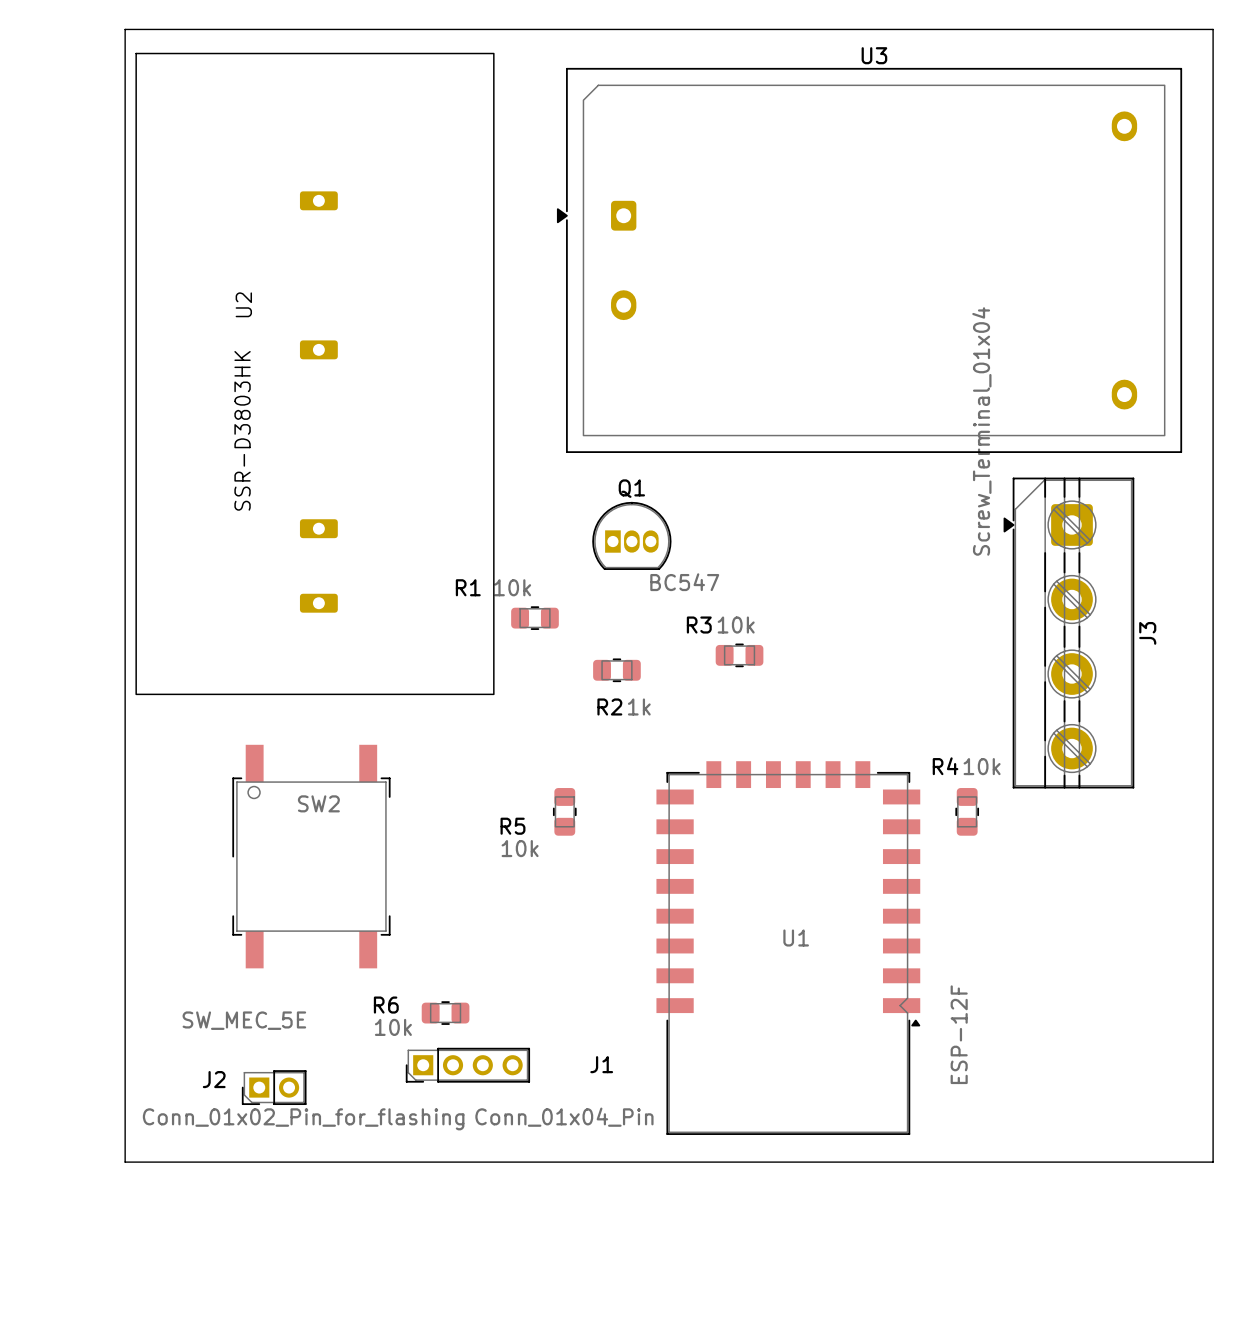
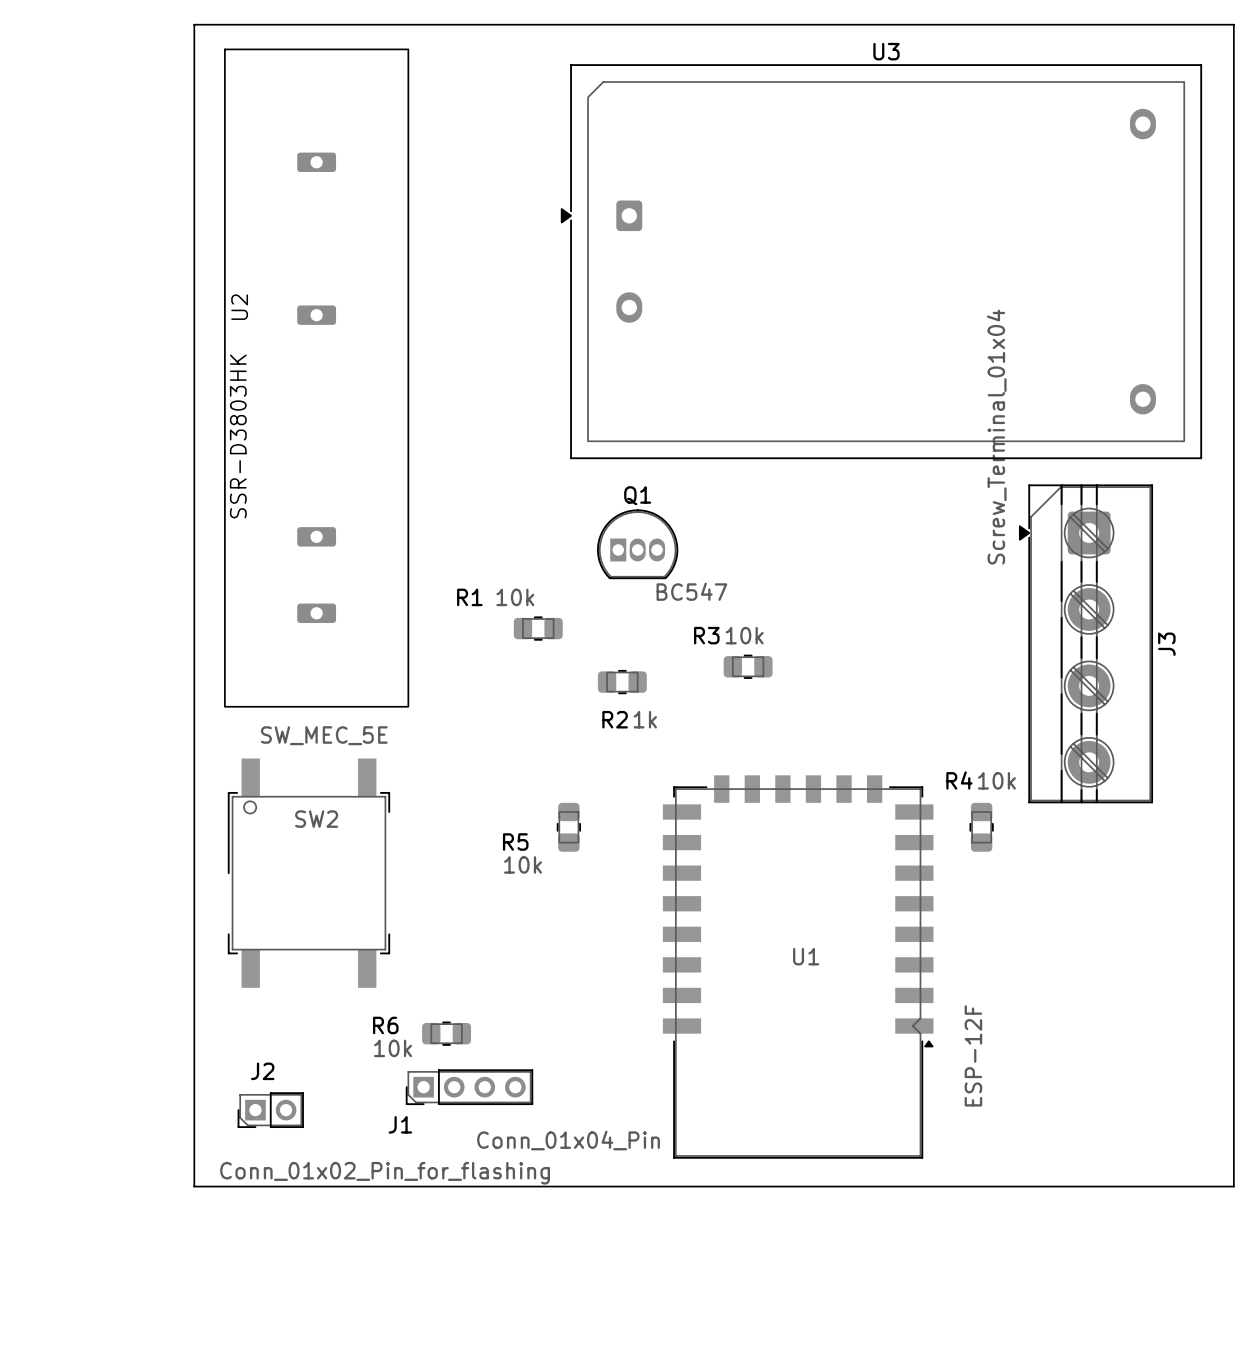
board edge: (199, 29) (125, 29) (125, 1162) (199, 1162) -> (194, 24) (194, 1186)
U2 footprint: [135, 52, 495, 696] -> [224, 48, 410, 708]
SW2 value position: SW_MEC_5E (244, 1020) -> SW_MEC_5E (324, 735)
J1 name position: J1 (601, 1064) -> J1 (400, 1124)
J2 name position: J2 (214, 1079) -> J2 (262, 1071)
J2 value position: Conn_01x02_Pin_for_flashing (303, 1119) -> Conn_01x02_Pin_for_flashing (385, 1173)

